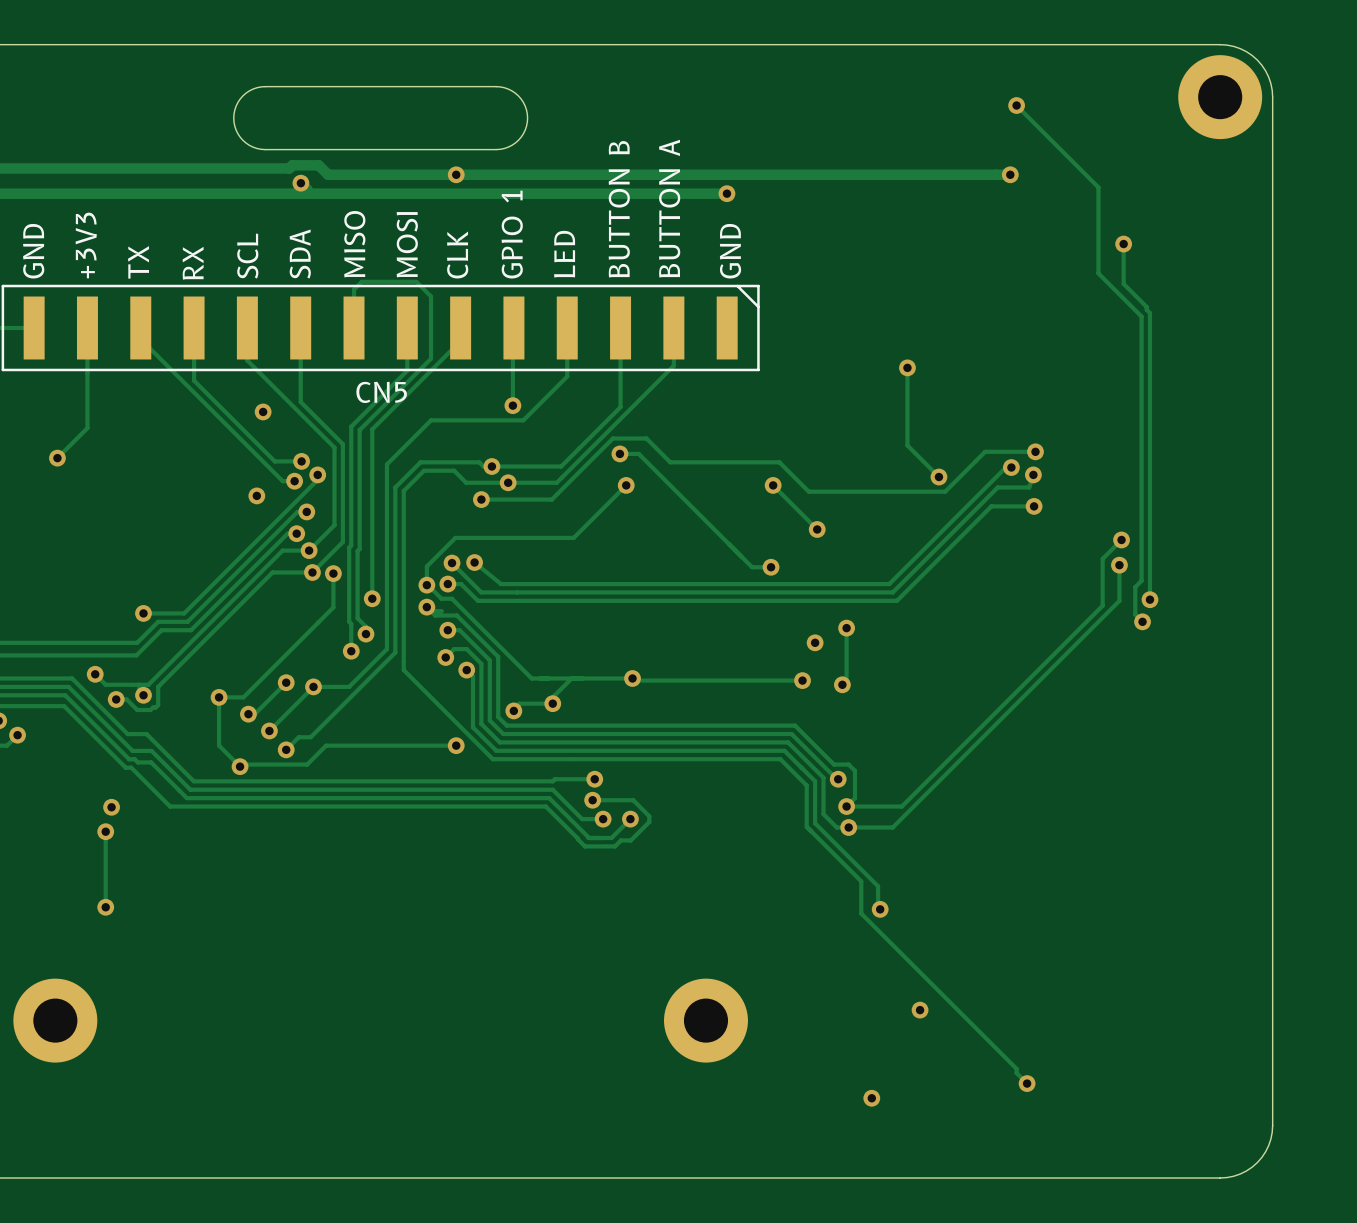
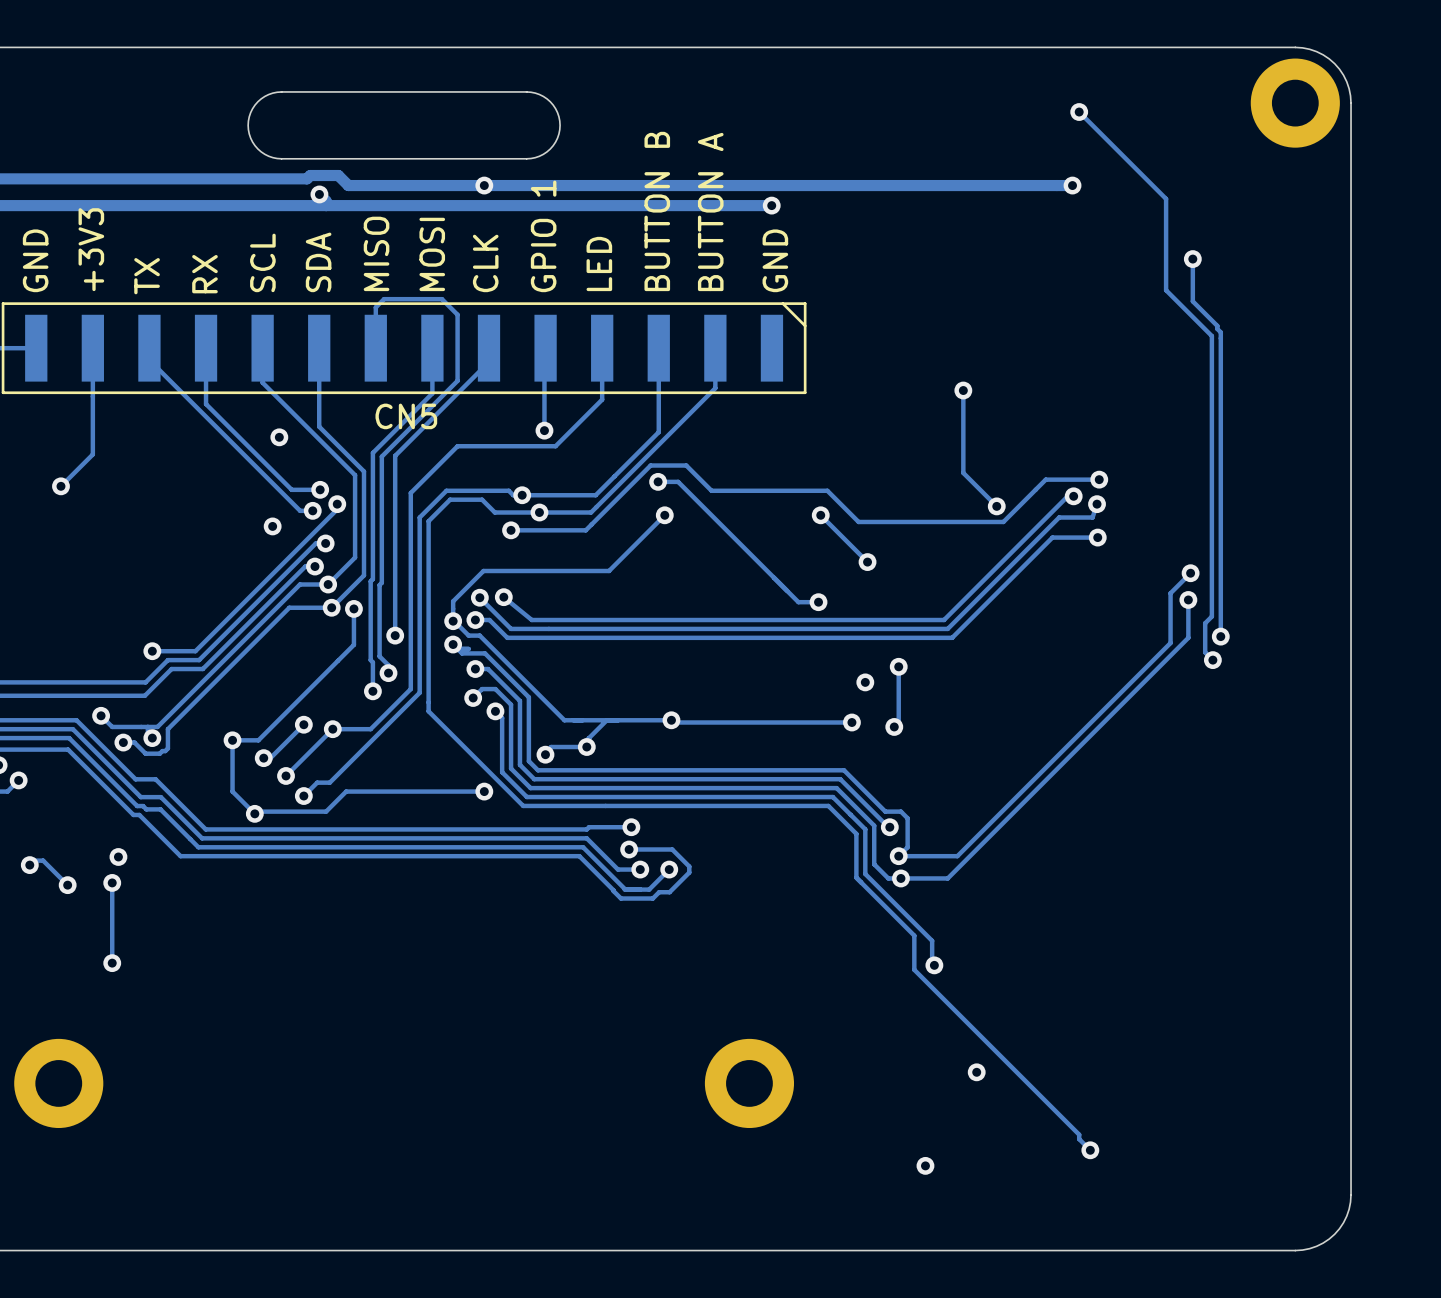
track: none -> (29, 865) (34, 860) (43, 860) (67, 885)
via: none -> (29, 865)
via: none -> (67, 885)

